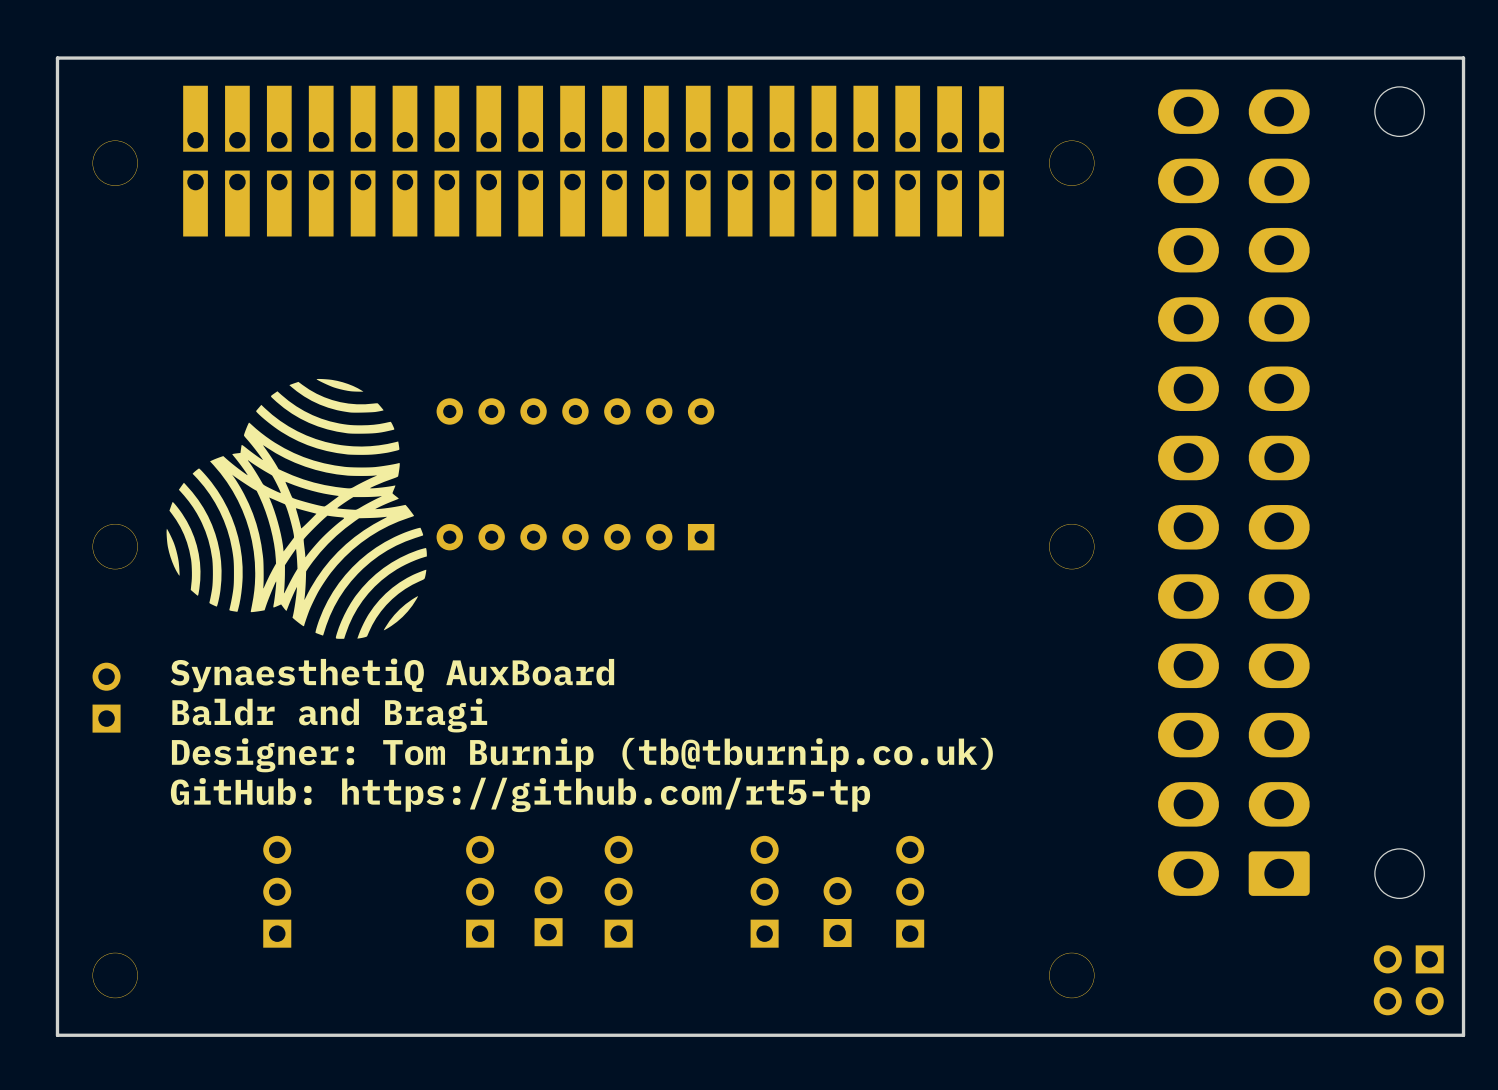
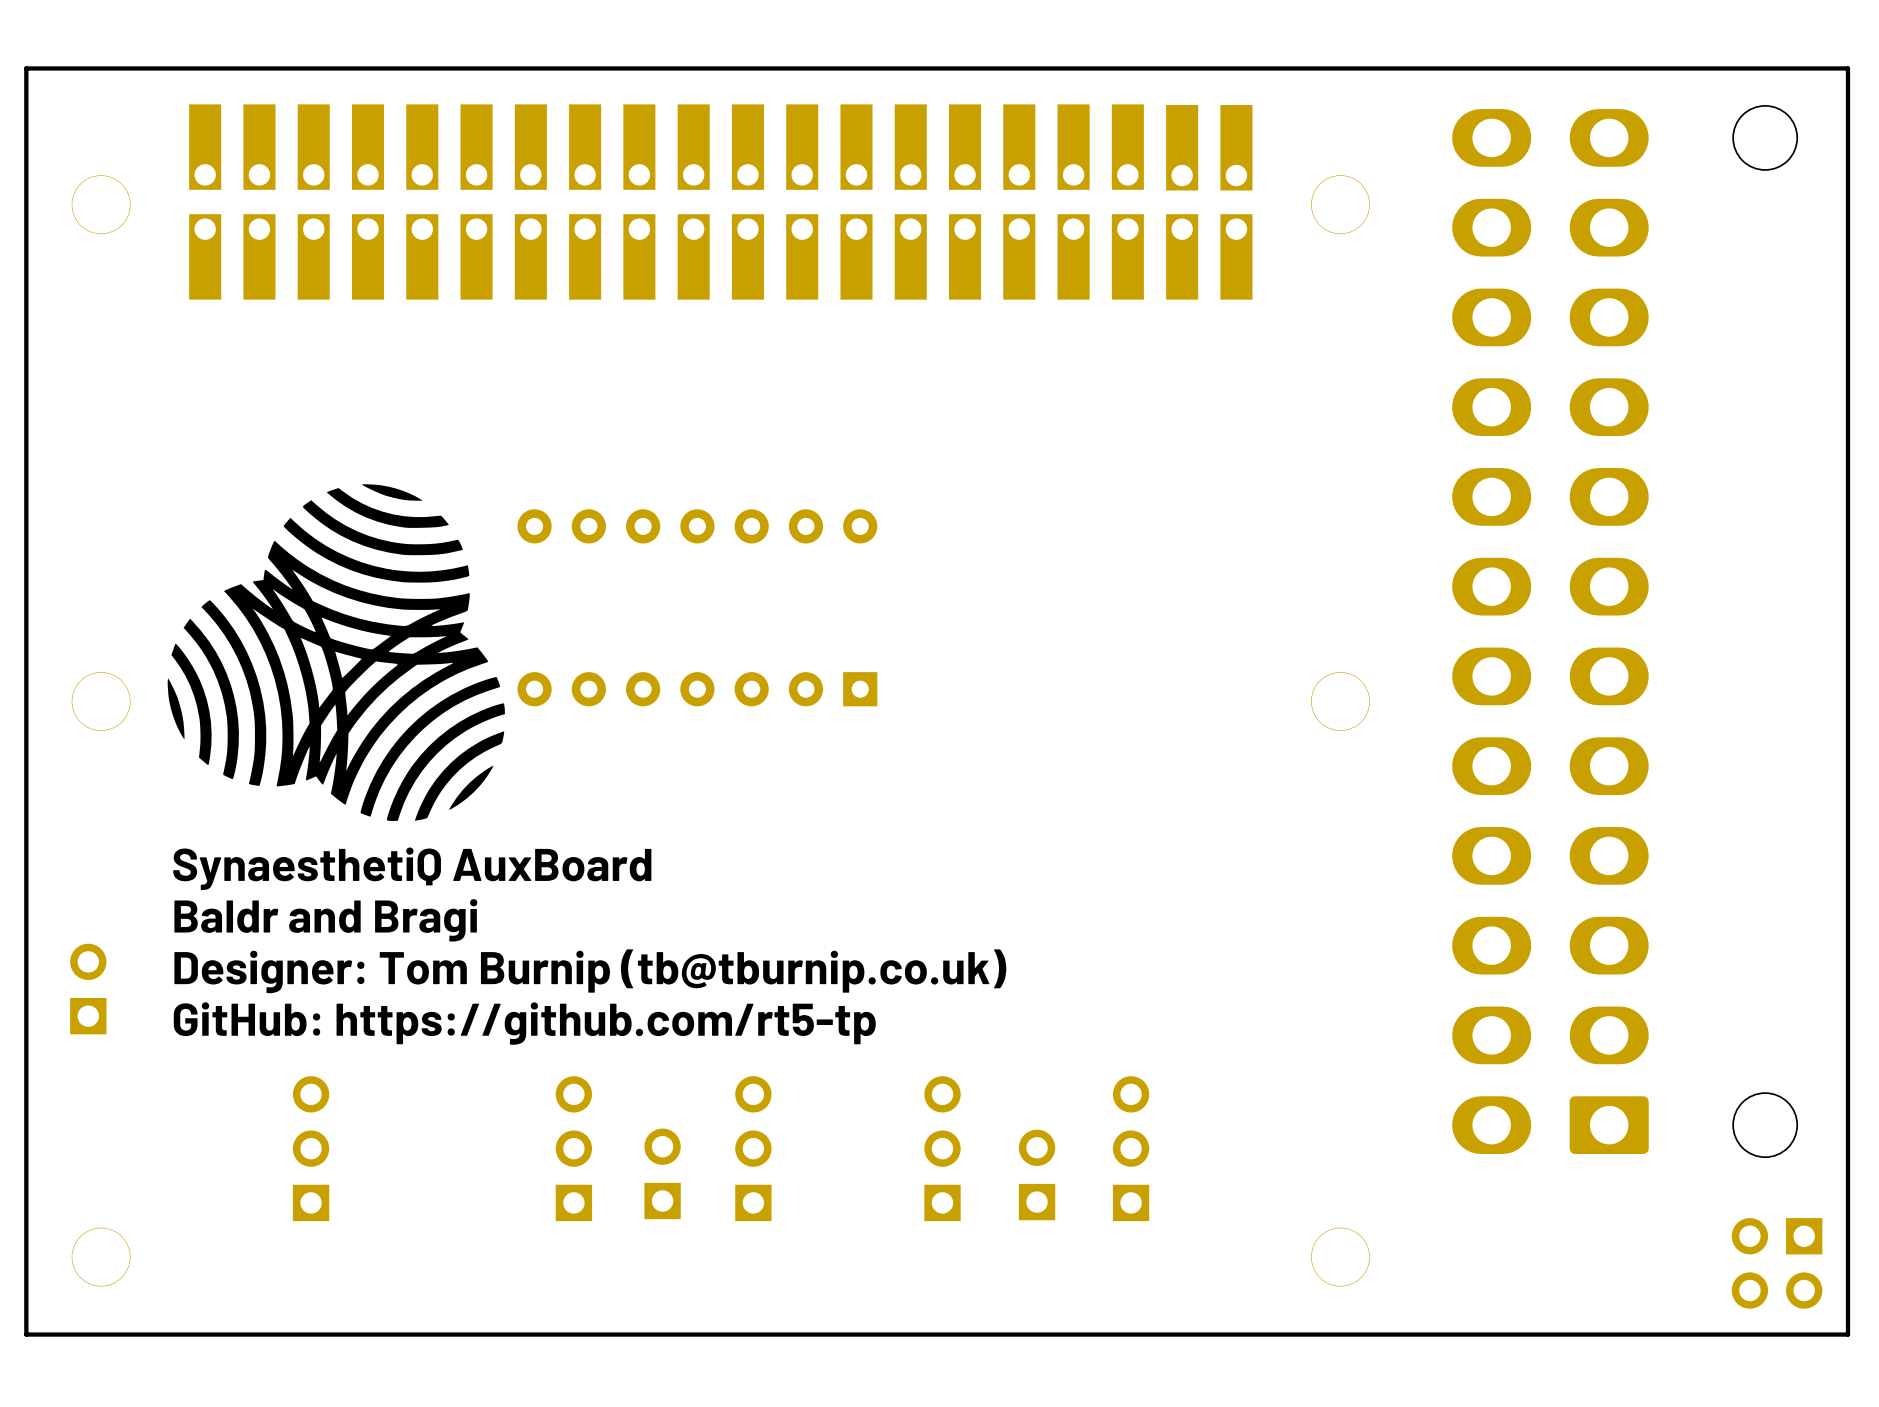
part position: (106, 697) -> (88, 989)

